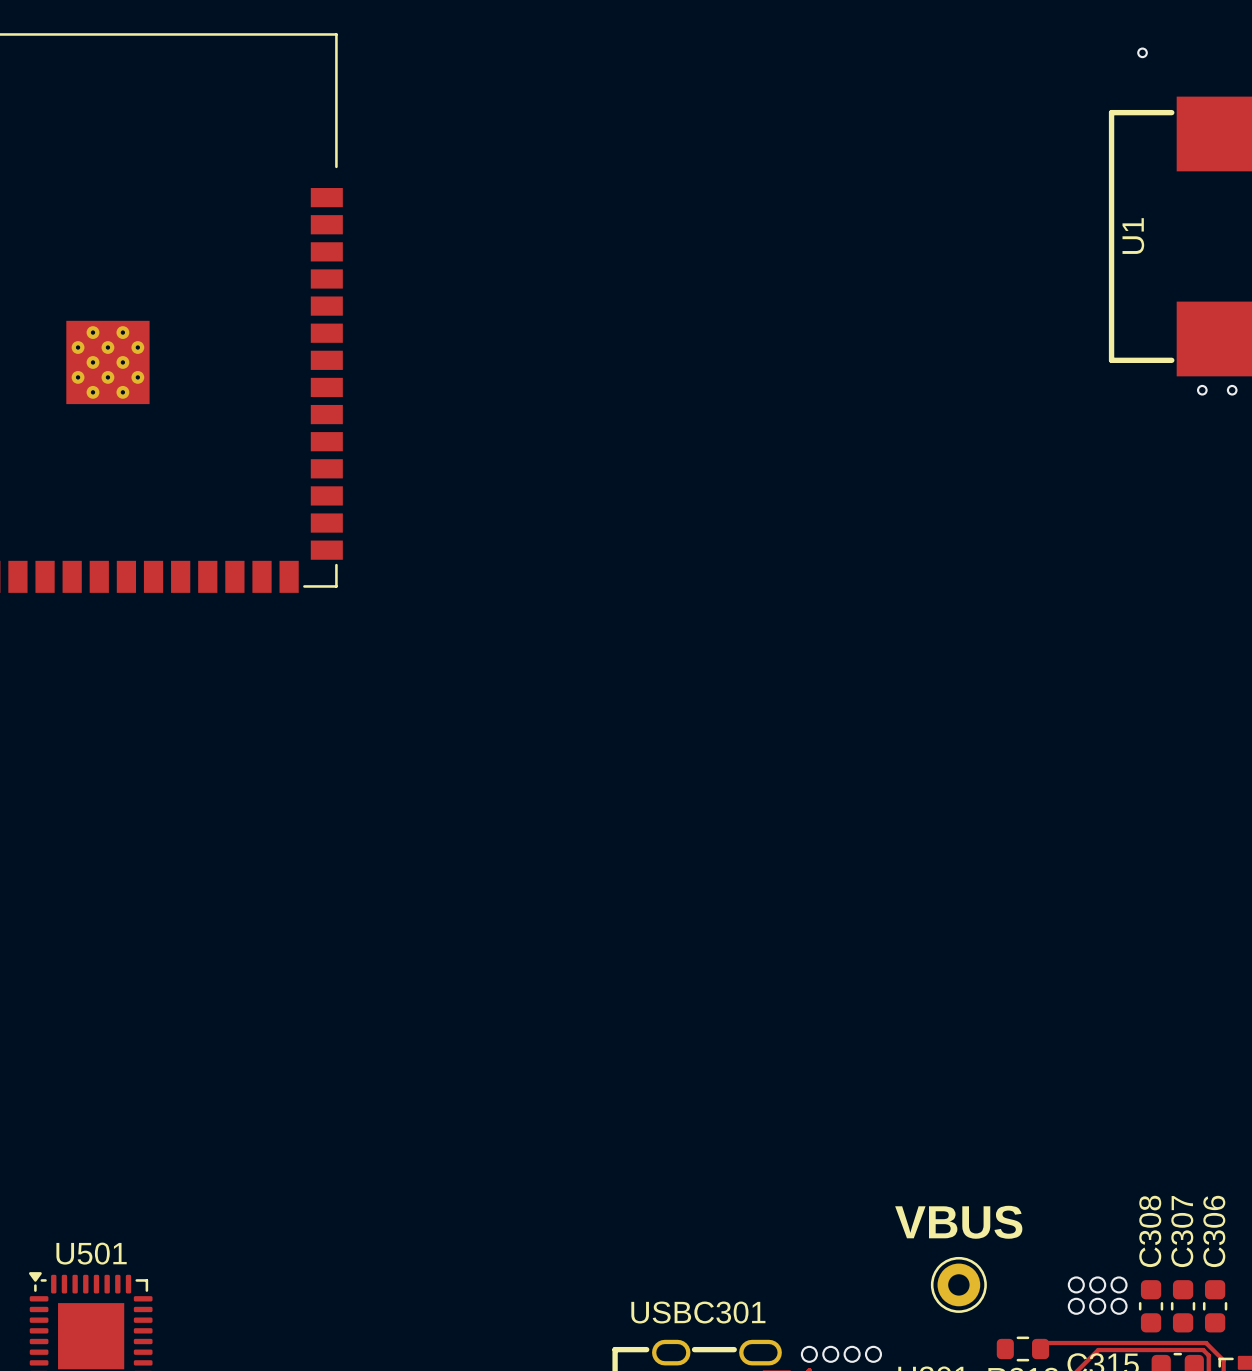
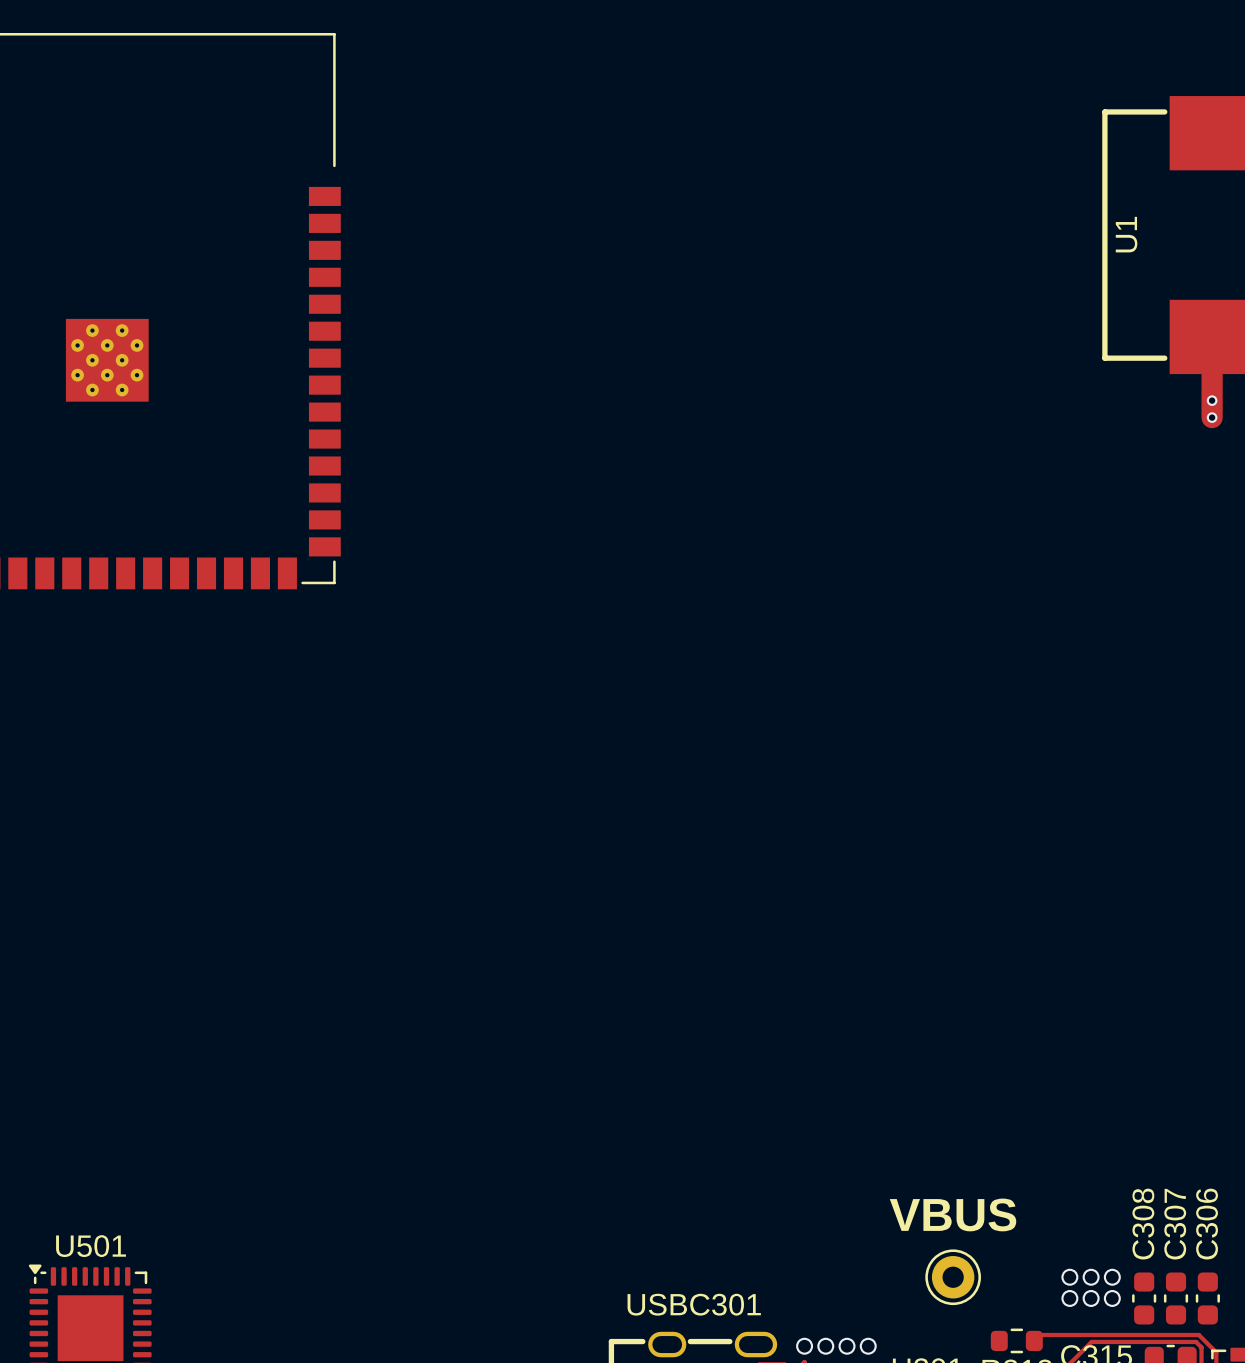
via: (1142, 52) -> none
track: none -> (1212, 362) (1212, 417)
via: (1202, 390) -> none
via: (1232, 390) -> none
via: none -> (1212, 400)
via: none -> (1212, 417)

